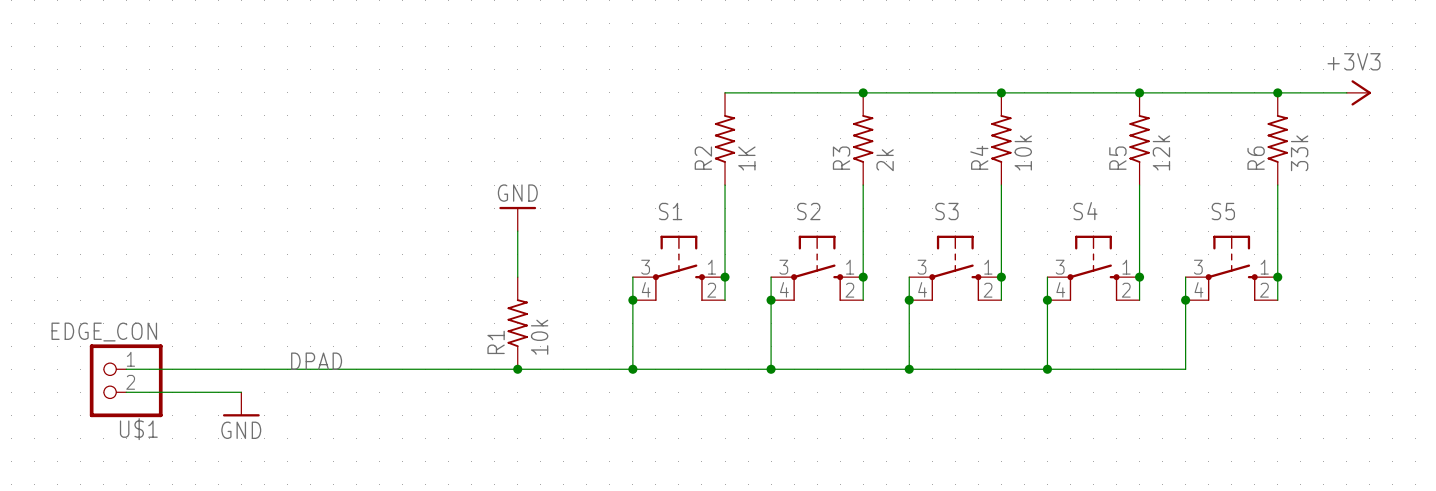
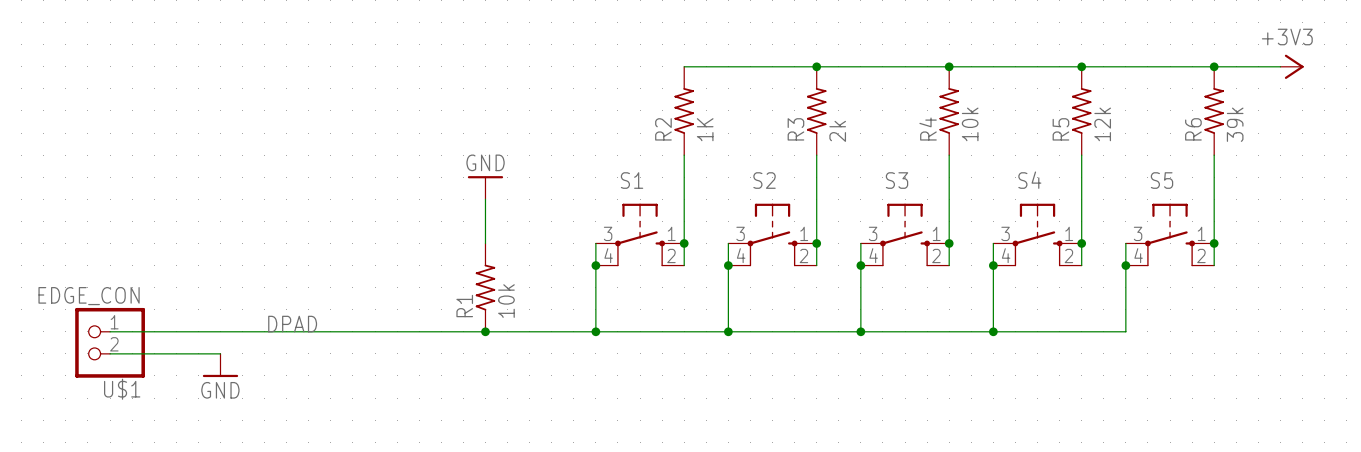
R6 value: 33k (1299, 153) -> 39k (1235, 124)

